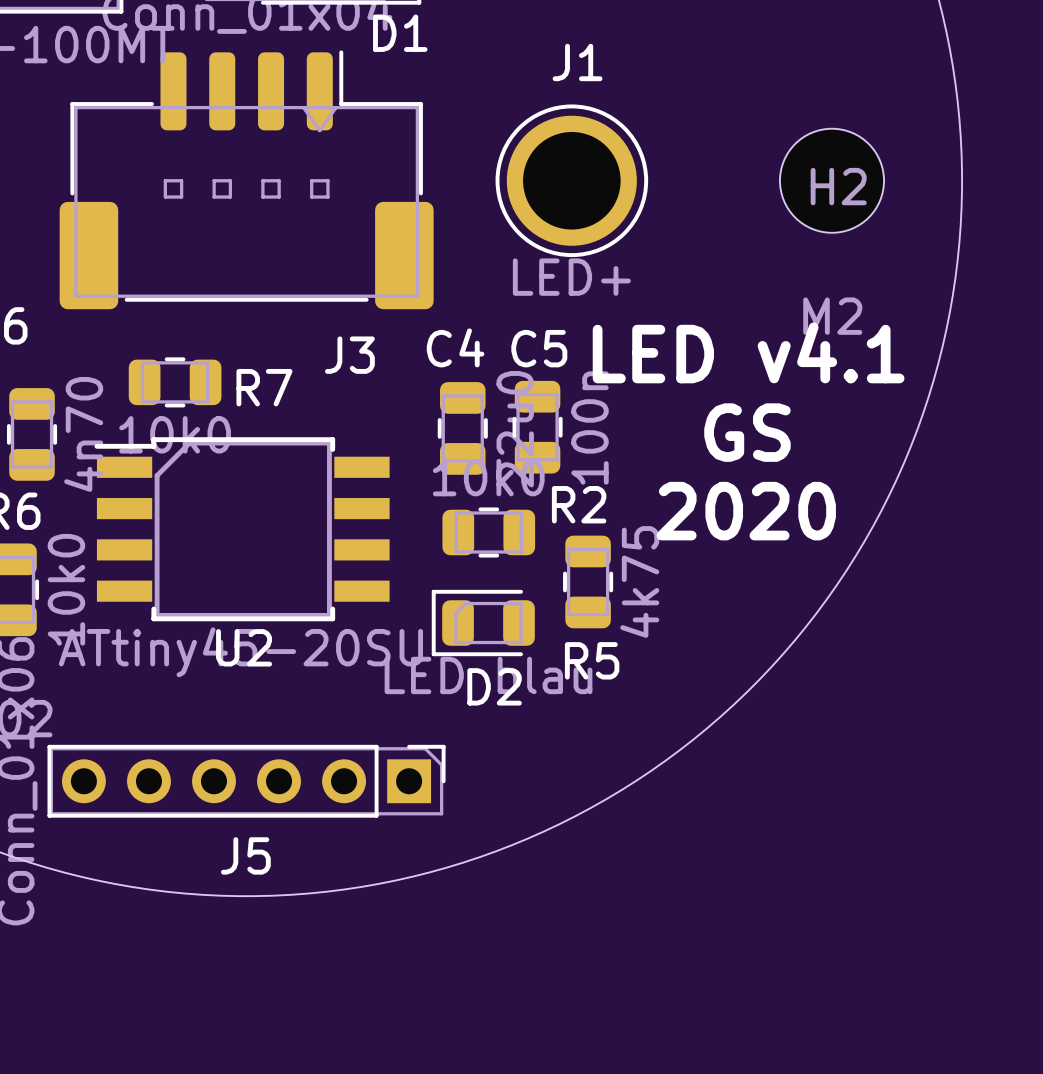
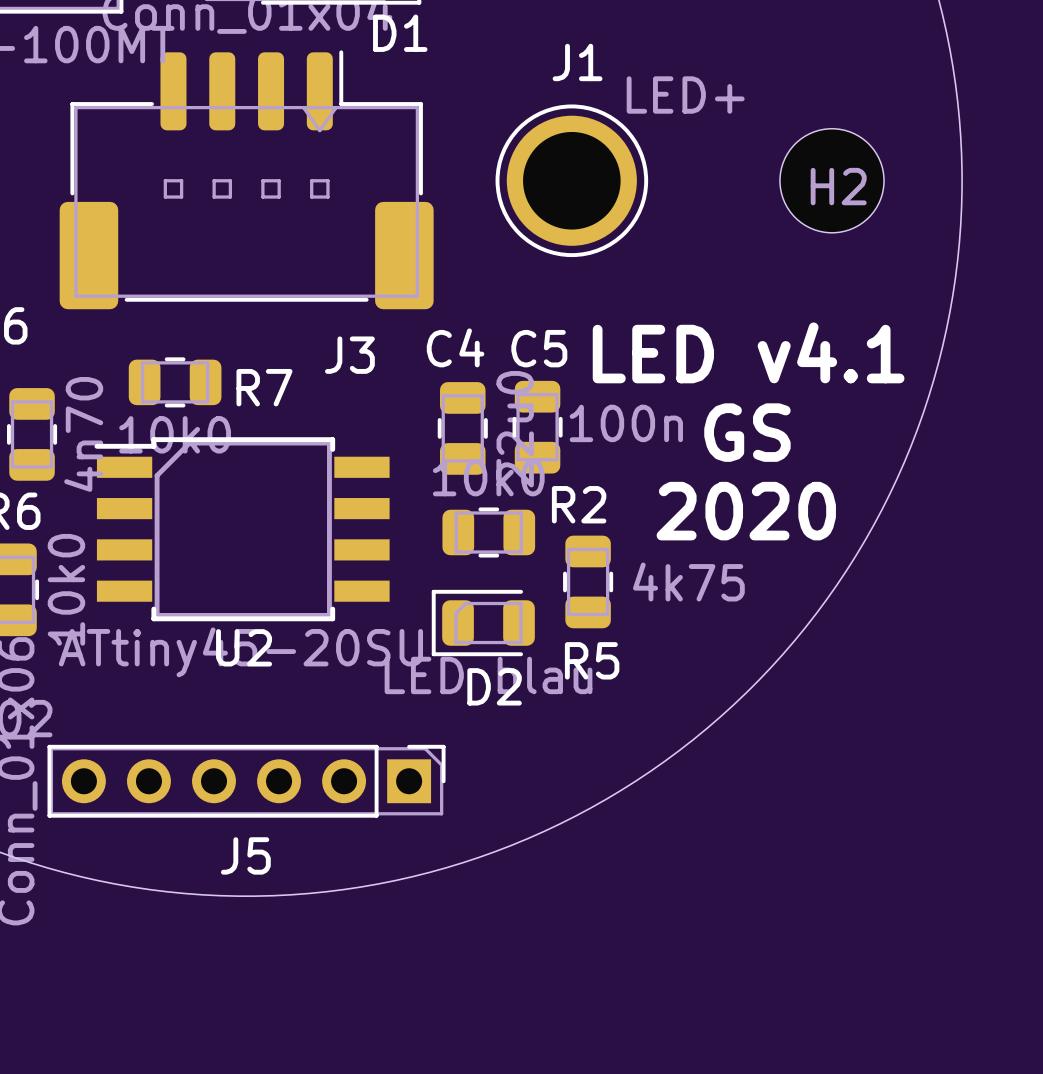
J1 value position: LED+ (571, 277) -> LED+ (685, 95)
H2 value: M2 (832, 316) -> none
C5 value rotation: 0° (590, 427) -> 90° clockwise (626, 423)
R5 value rotation: 0° (639, 581) -> 90° clockwise (688, 582)

